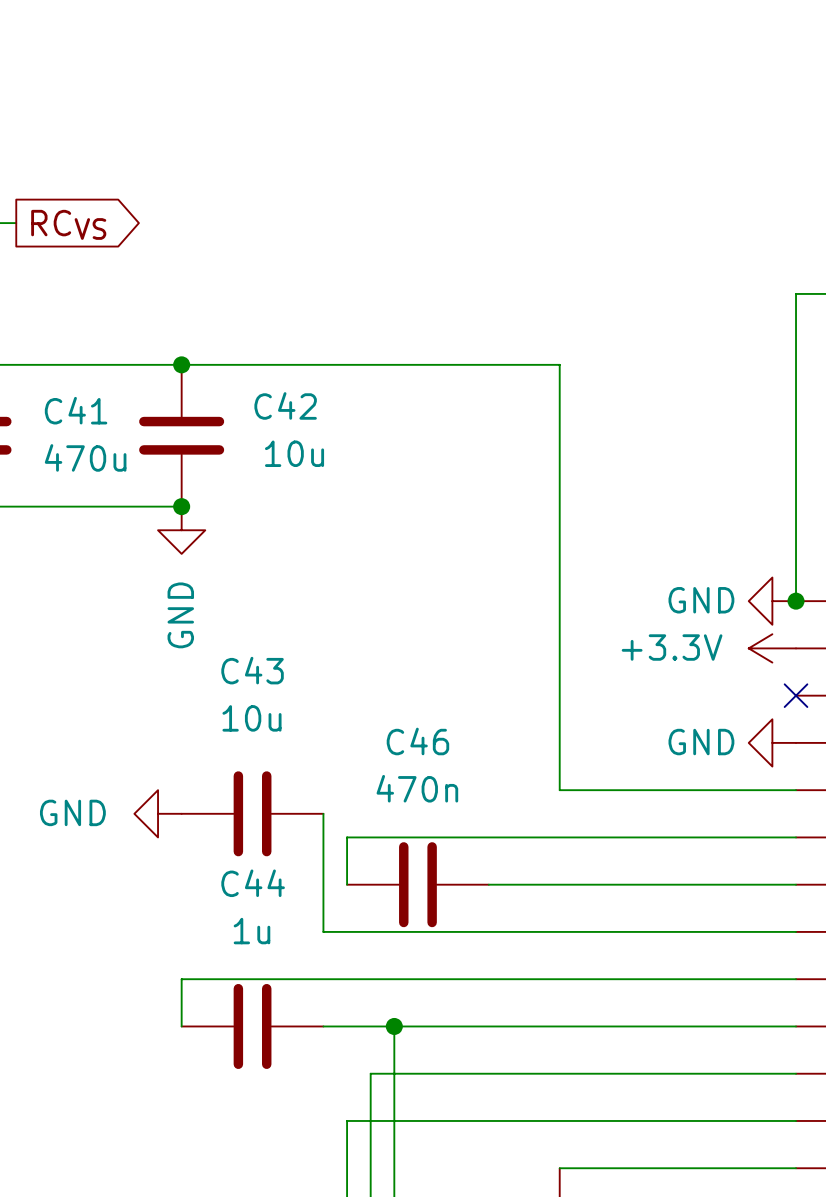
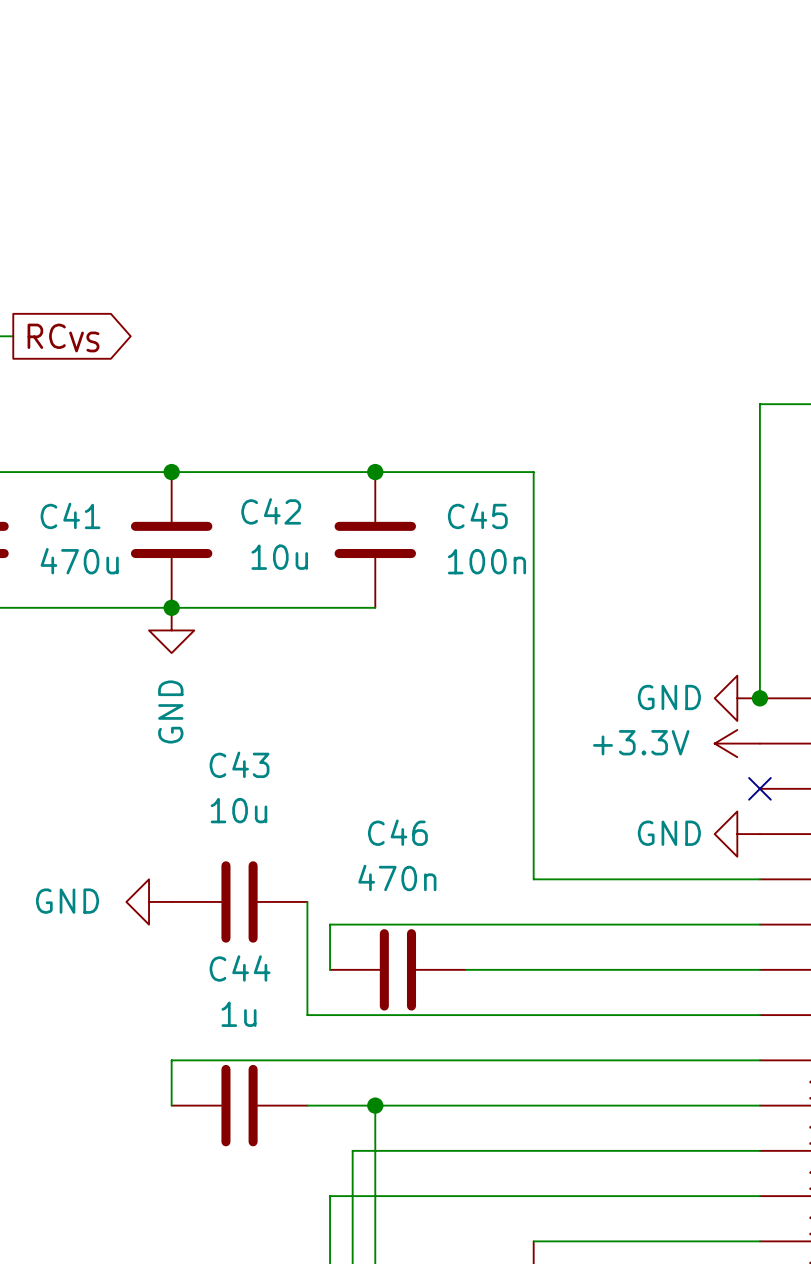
junction: none -> (375, 472)
C45: none -> 100n (375, 539)
wire: none -> (171, 607) (375, 607)

